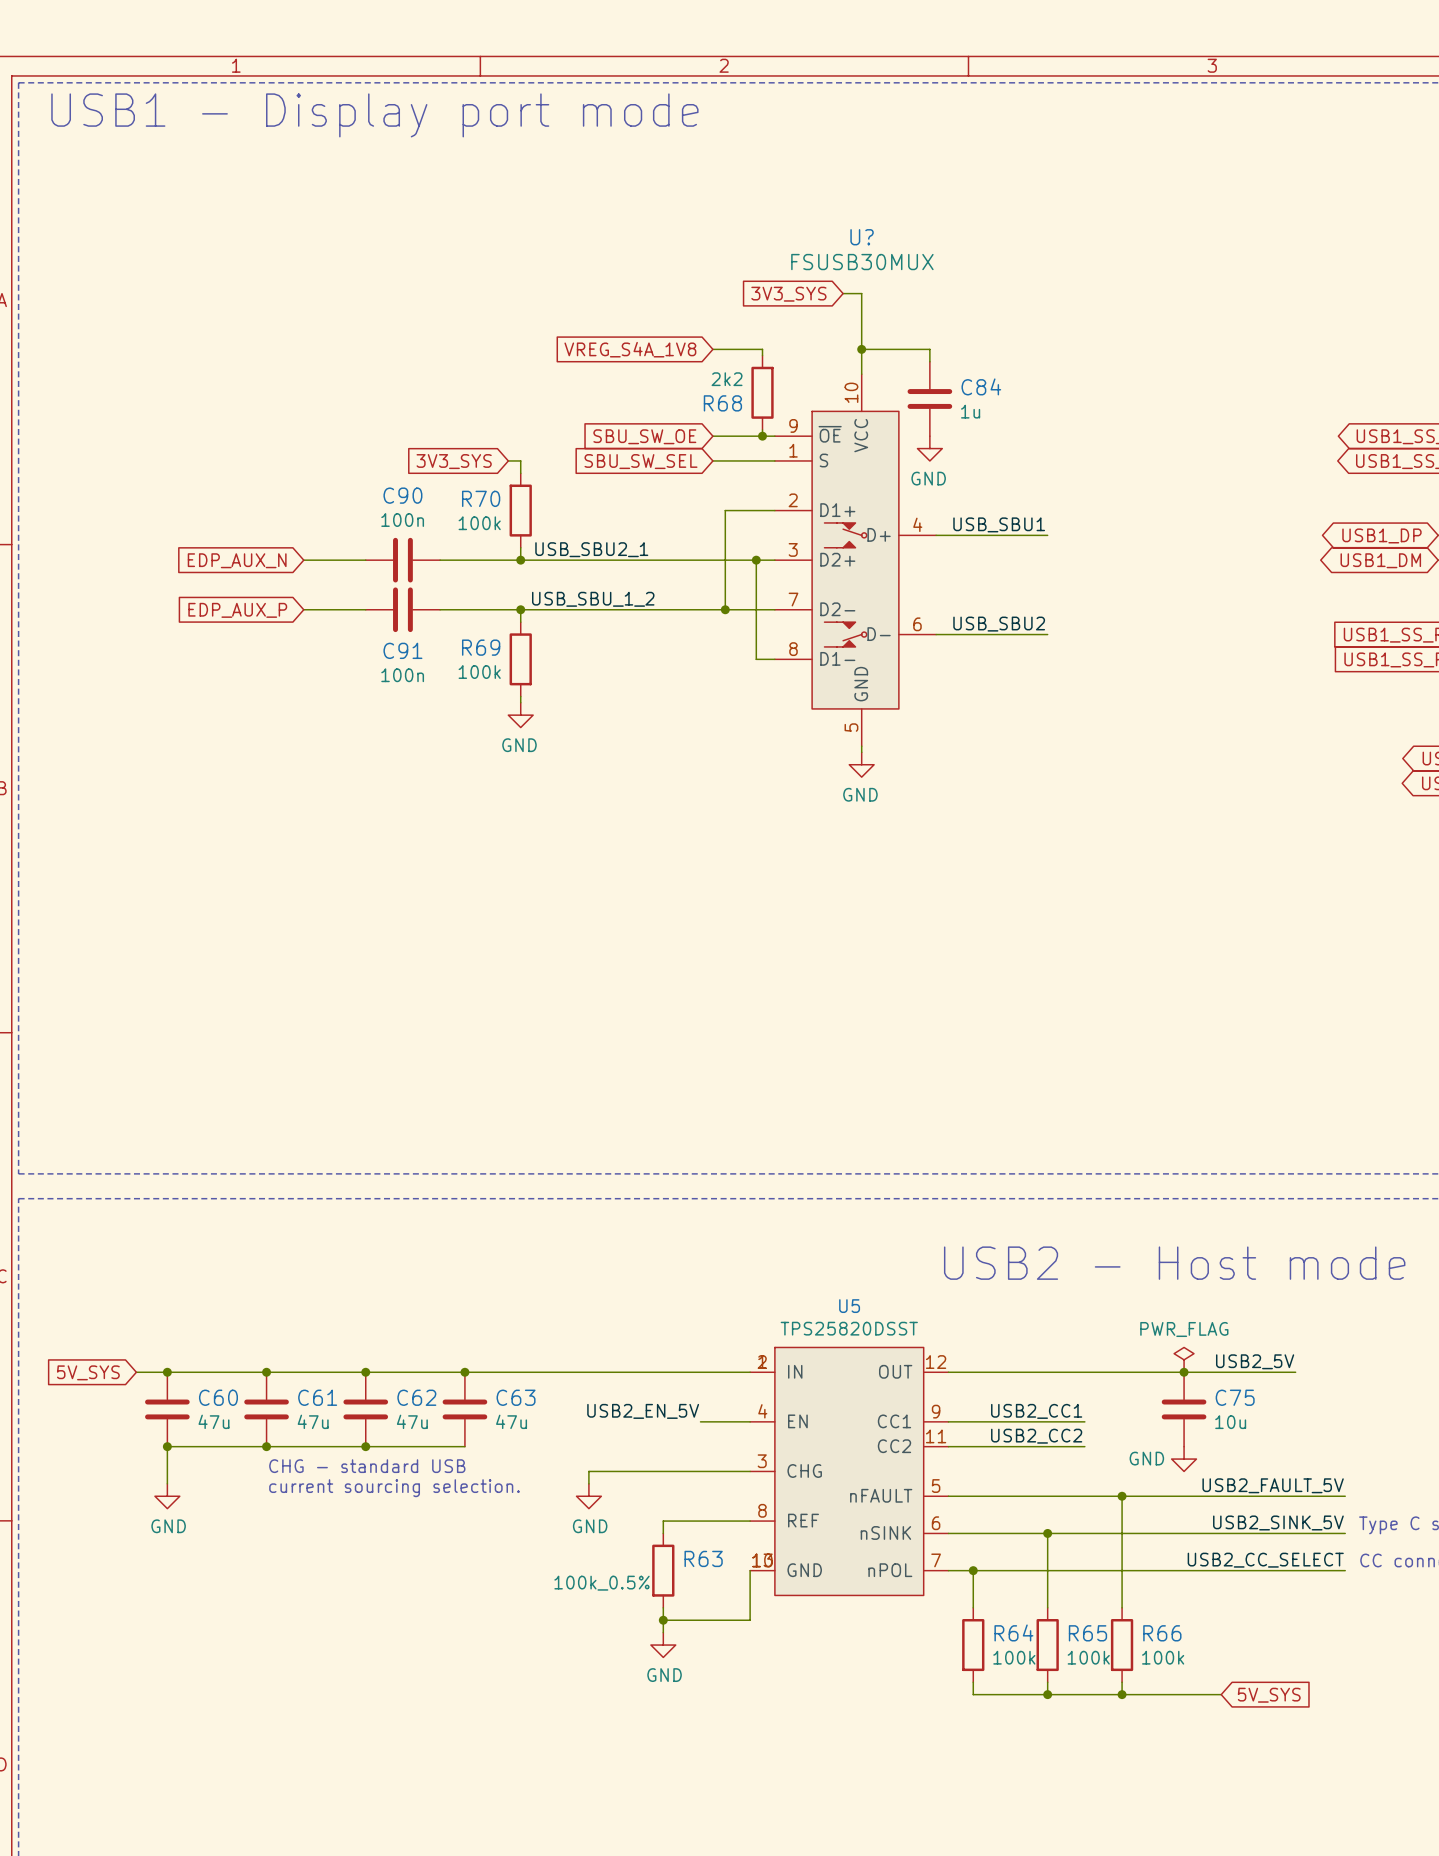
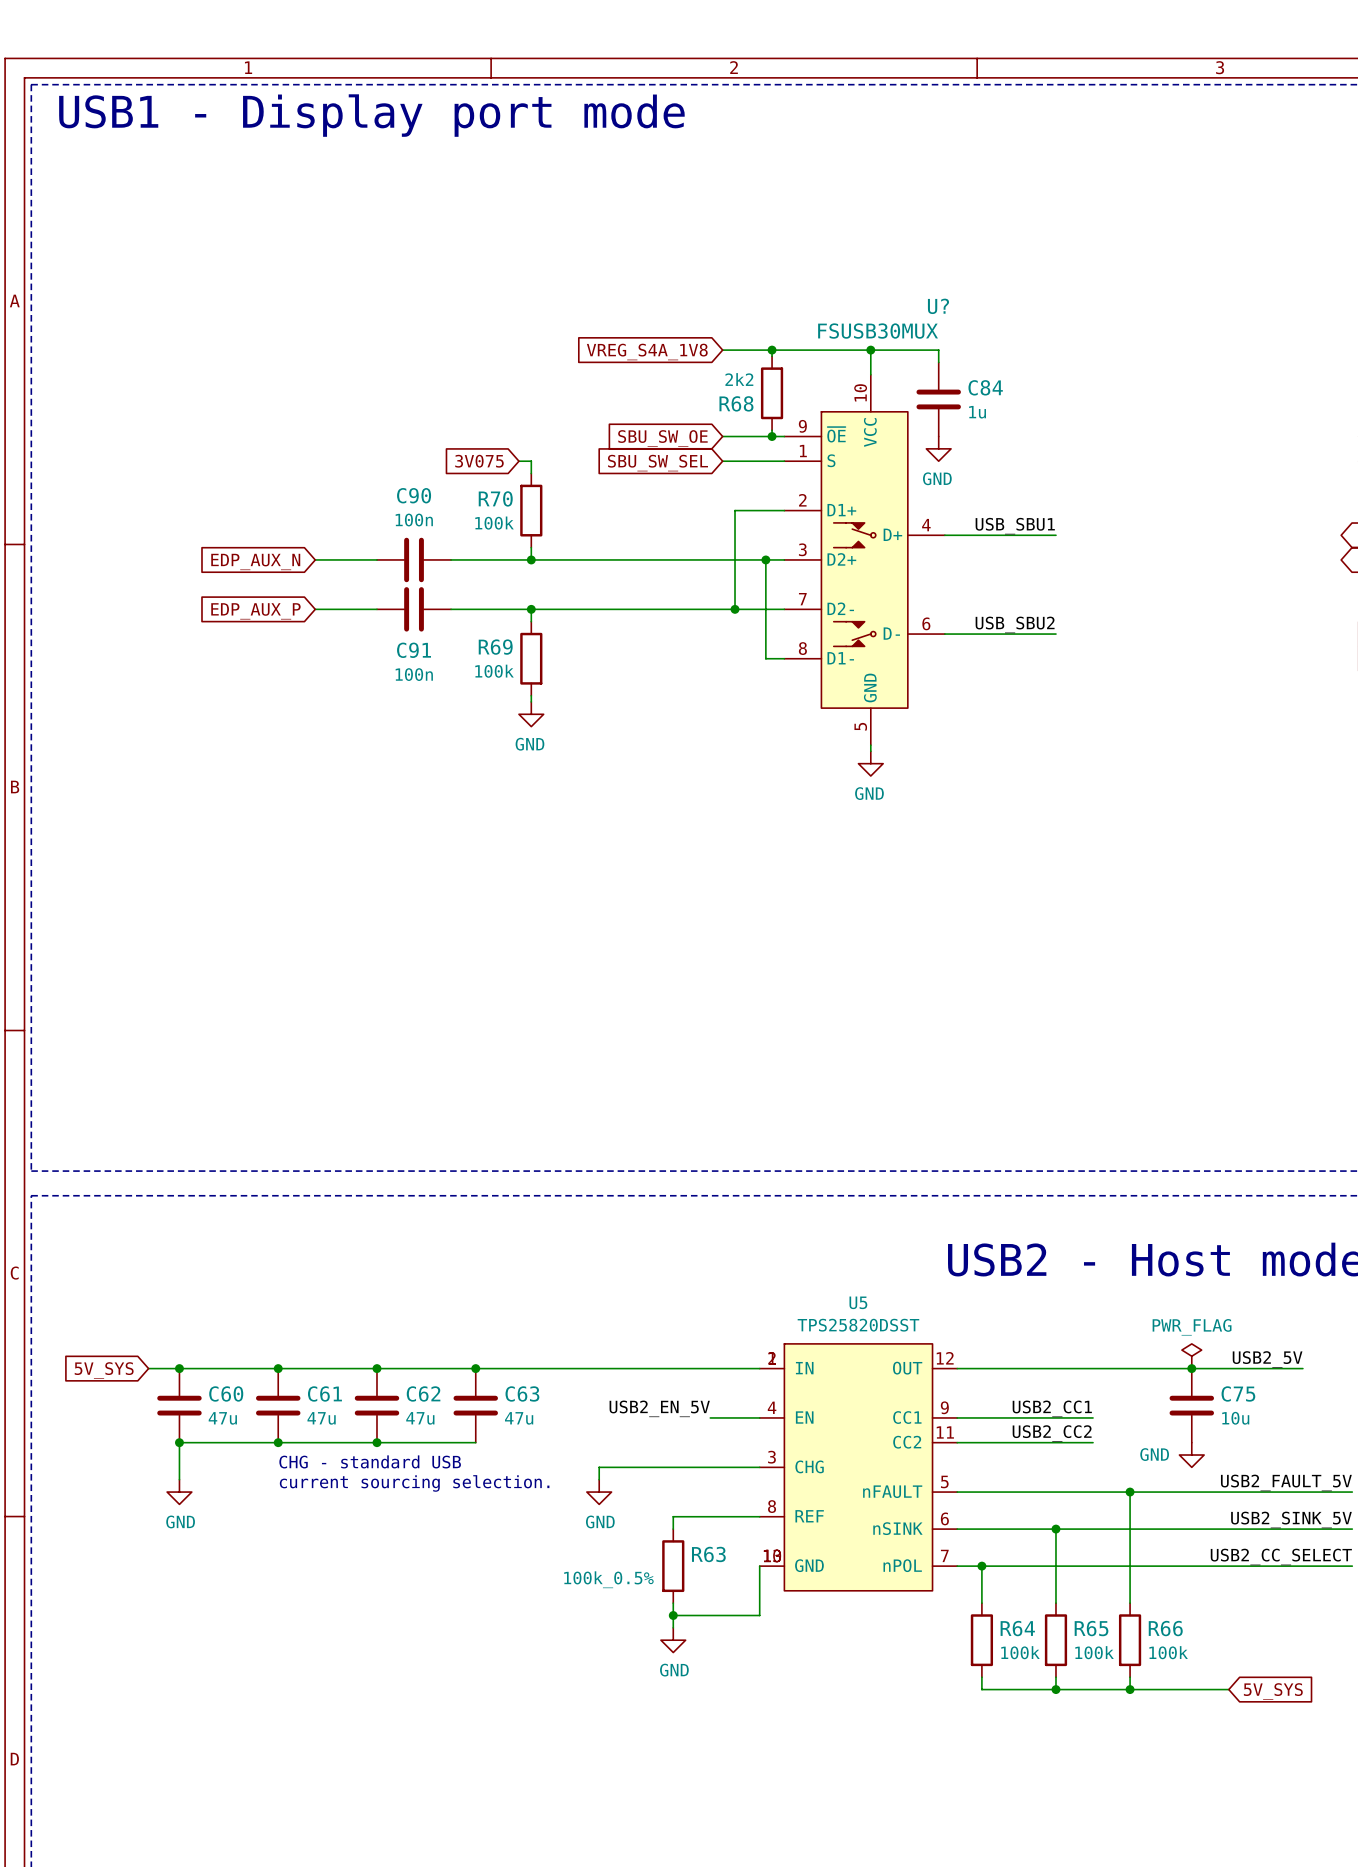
U? name position: U? (862, 237) -> U? (938, 306)
U? value position: FSUSB30MUX (862, 262) -> FSUSB30MUX (878, 331)
wire: (843, 293) (861, 293) (861, 349) -> (772, 350) (870, 350)
global label: 3V3_SYS (788, 294) -> none
junction: none -> (772, 350)
global label: 3V3_SYS (454, 461) -> 3V075 (479, 461)
label: USB_SBU2_1 (591, 549) -> none
label: USB_SBU_1_2 (593, 599) -> none

